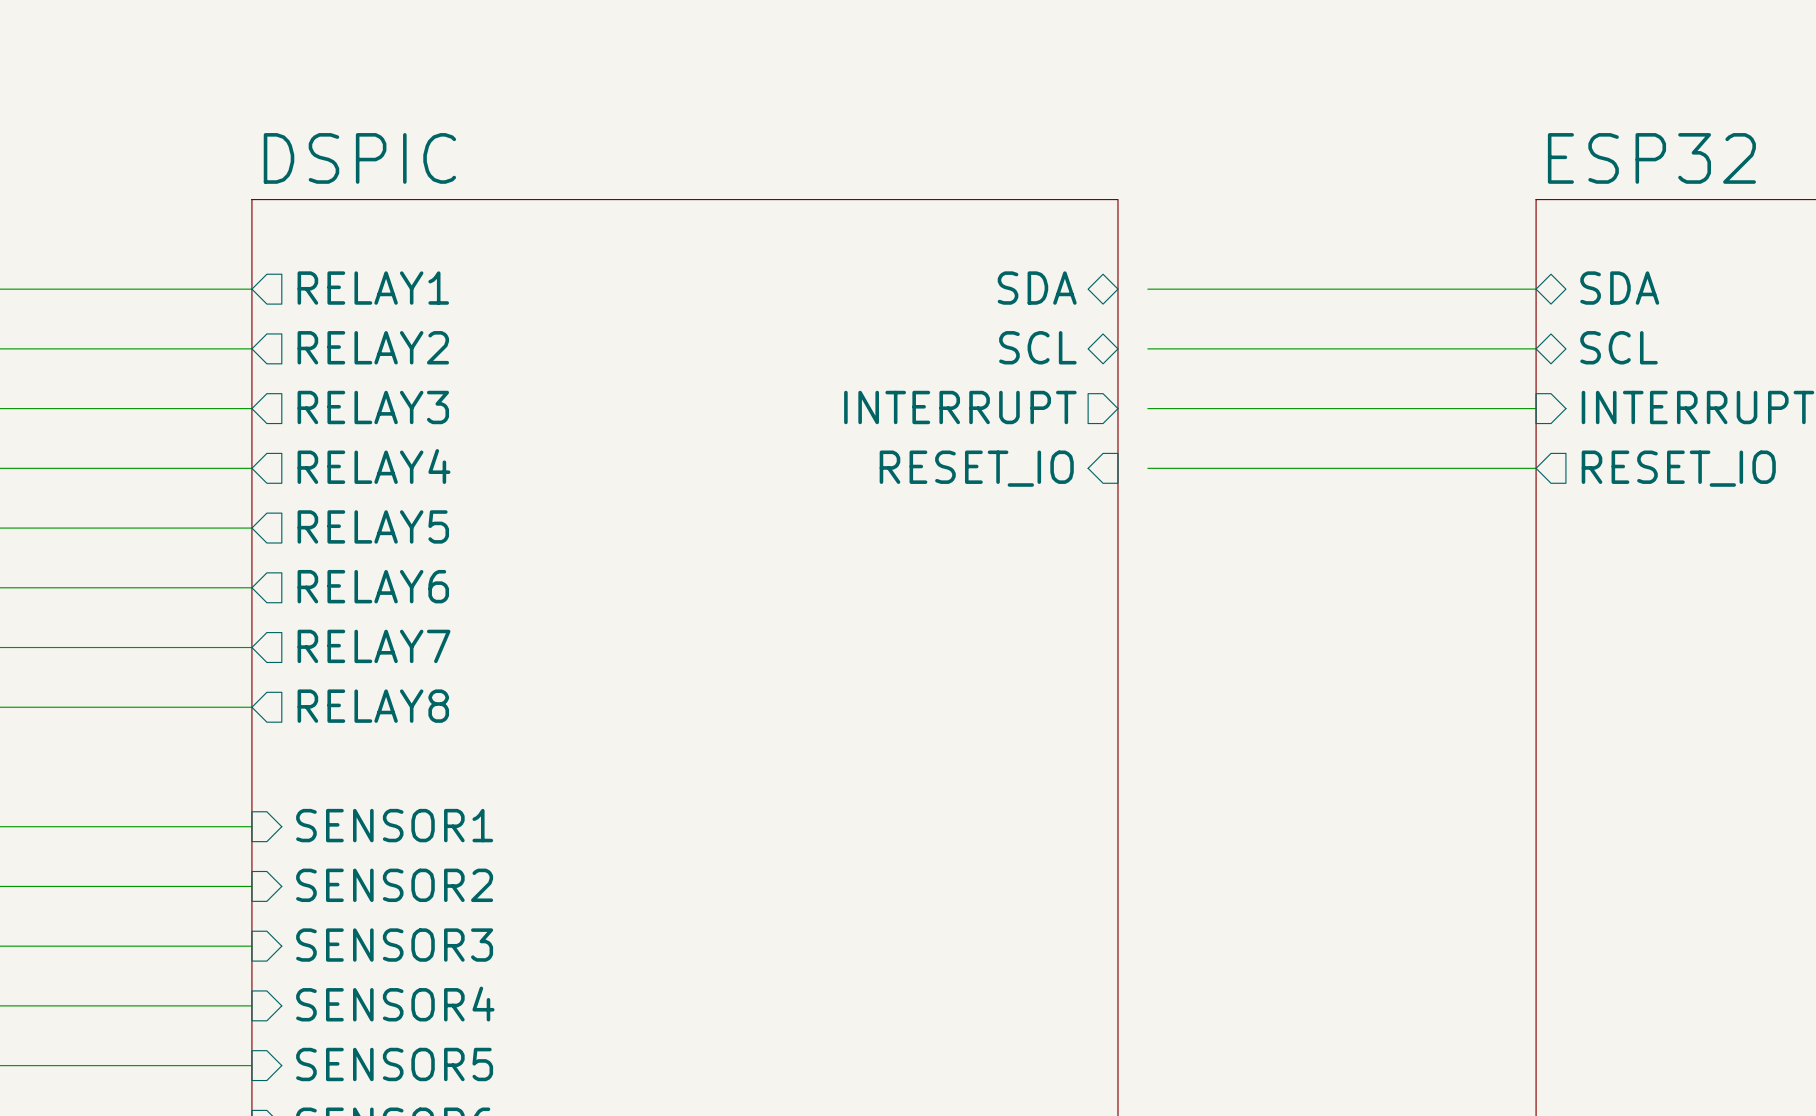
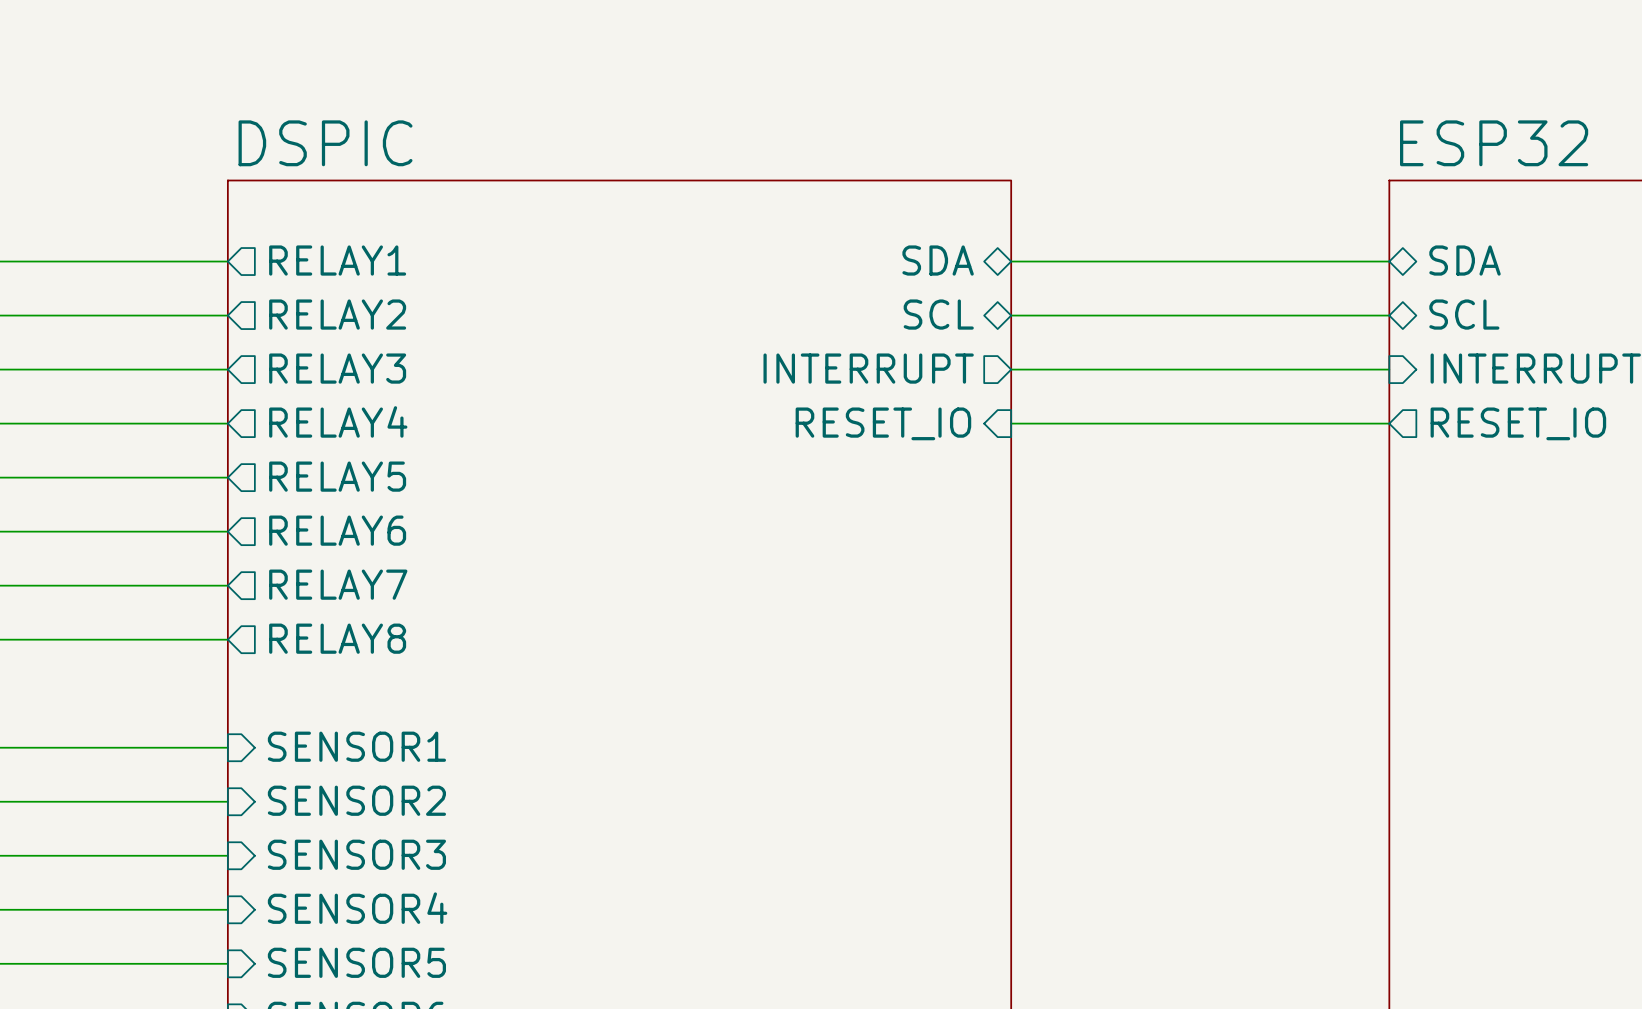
wire: none -> (1011, 261) (1038, 261)
wire: none -> (1011, 315) (1038, 315)
wire: none -> (1011, 369) (1038, 369)
wire: none -> (1011, 423) (1038, 423)

